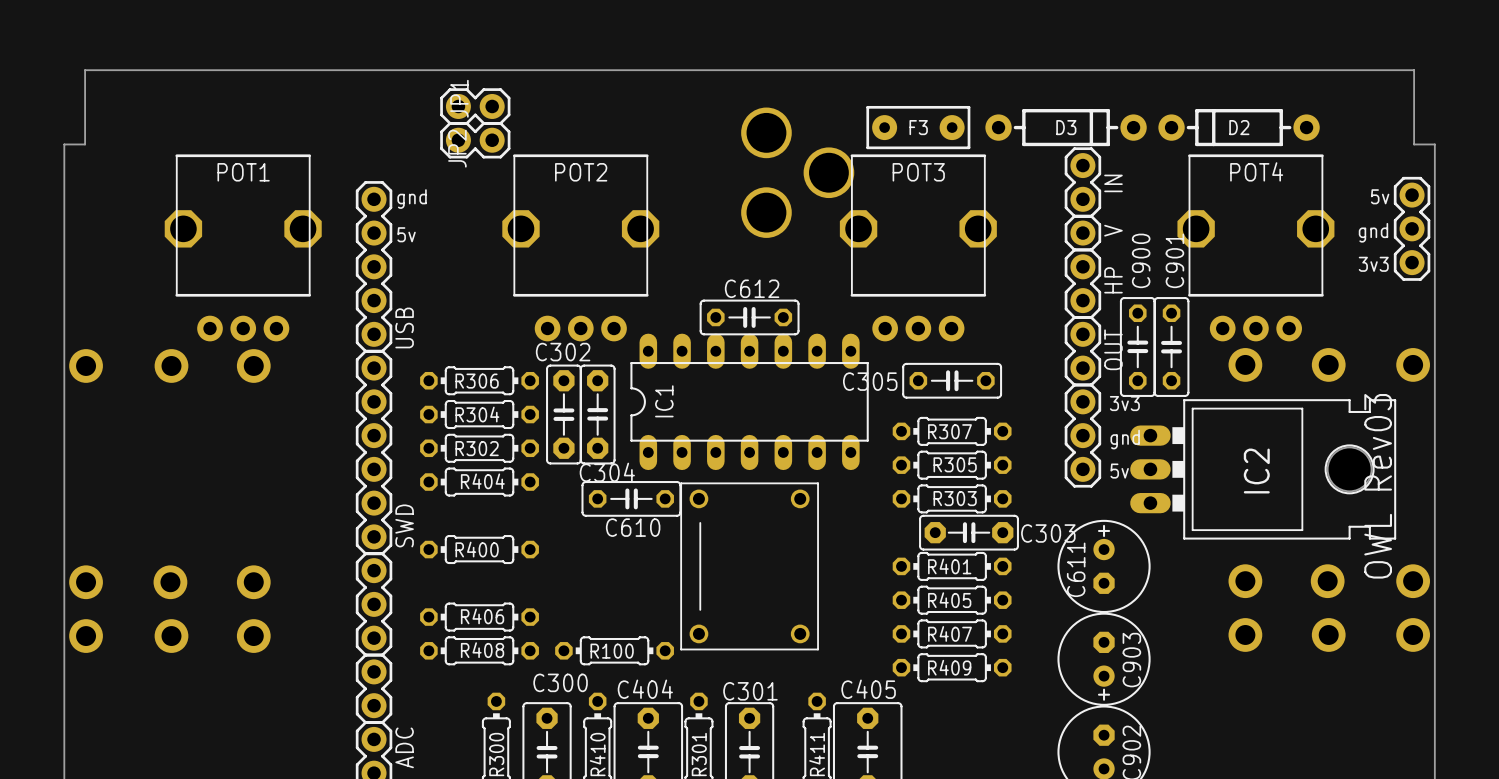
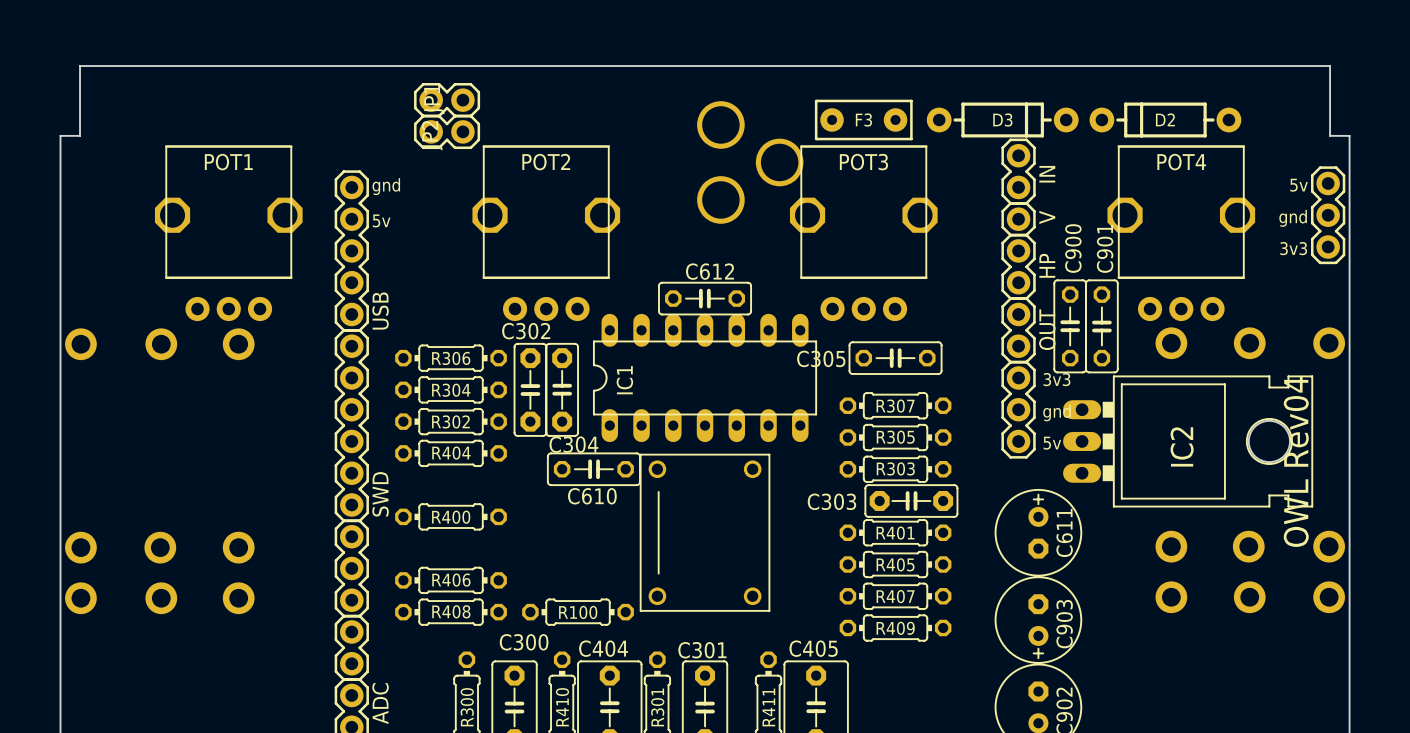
text: OWL Rev03 (1378, 486) -> OWL Rev04 (1296, 461)
C303 name position: C303 (1048, 533) -> C303 (831, 501)
C611 name position: C611 (1076, 569) -> C611 (1064, 532)

